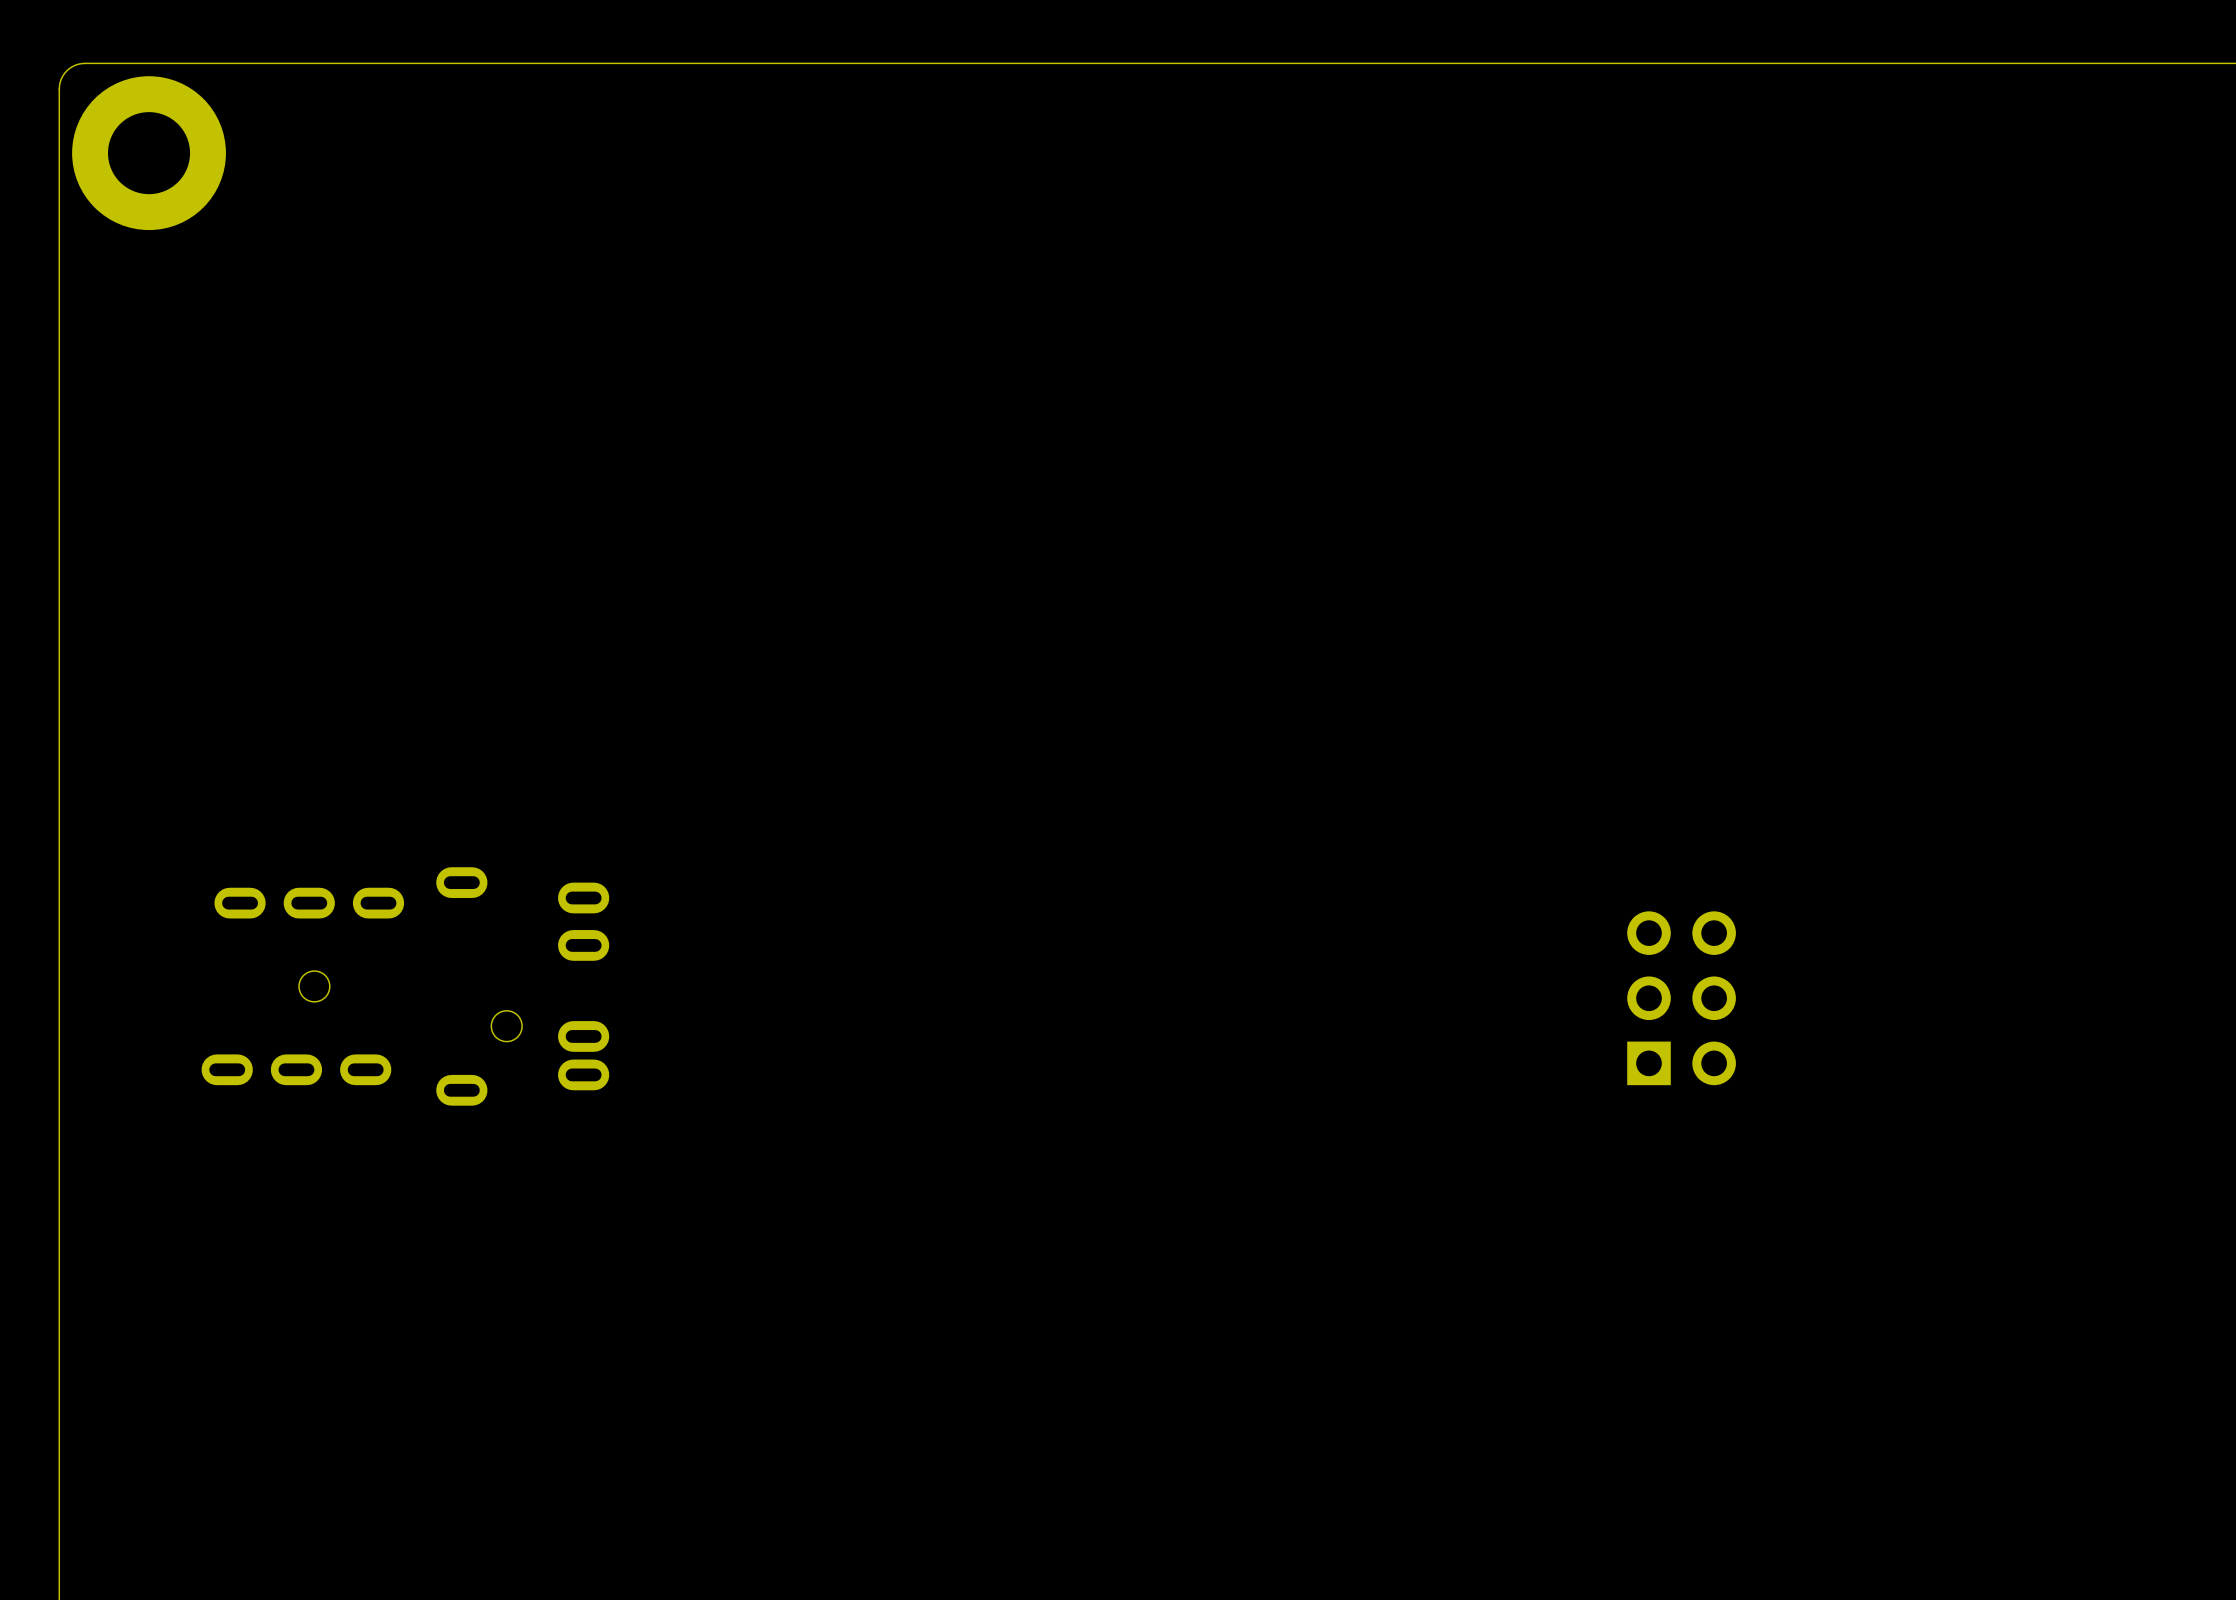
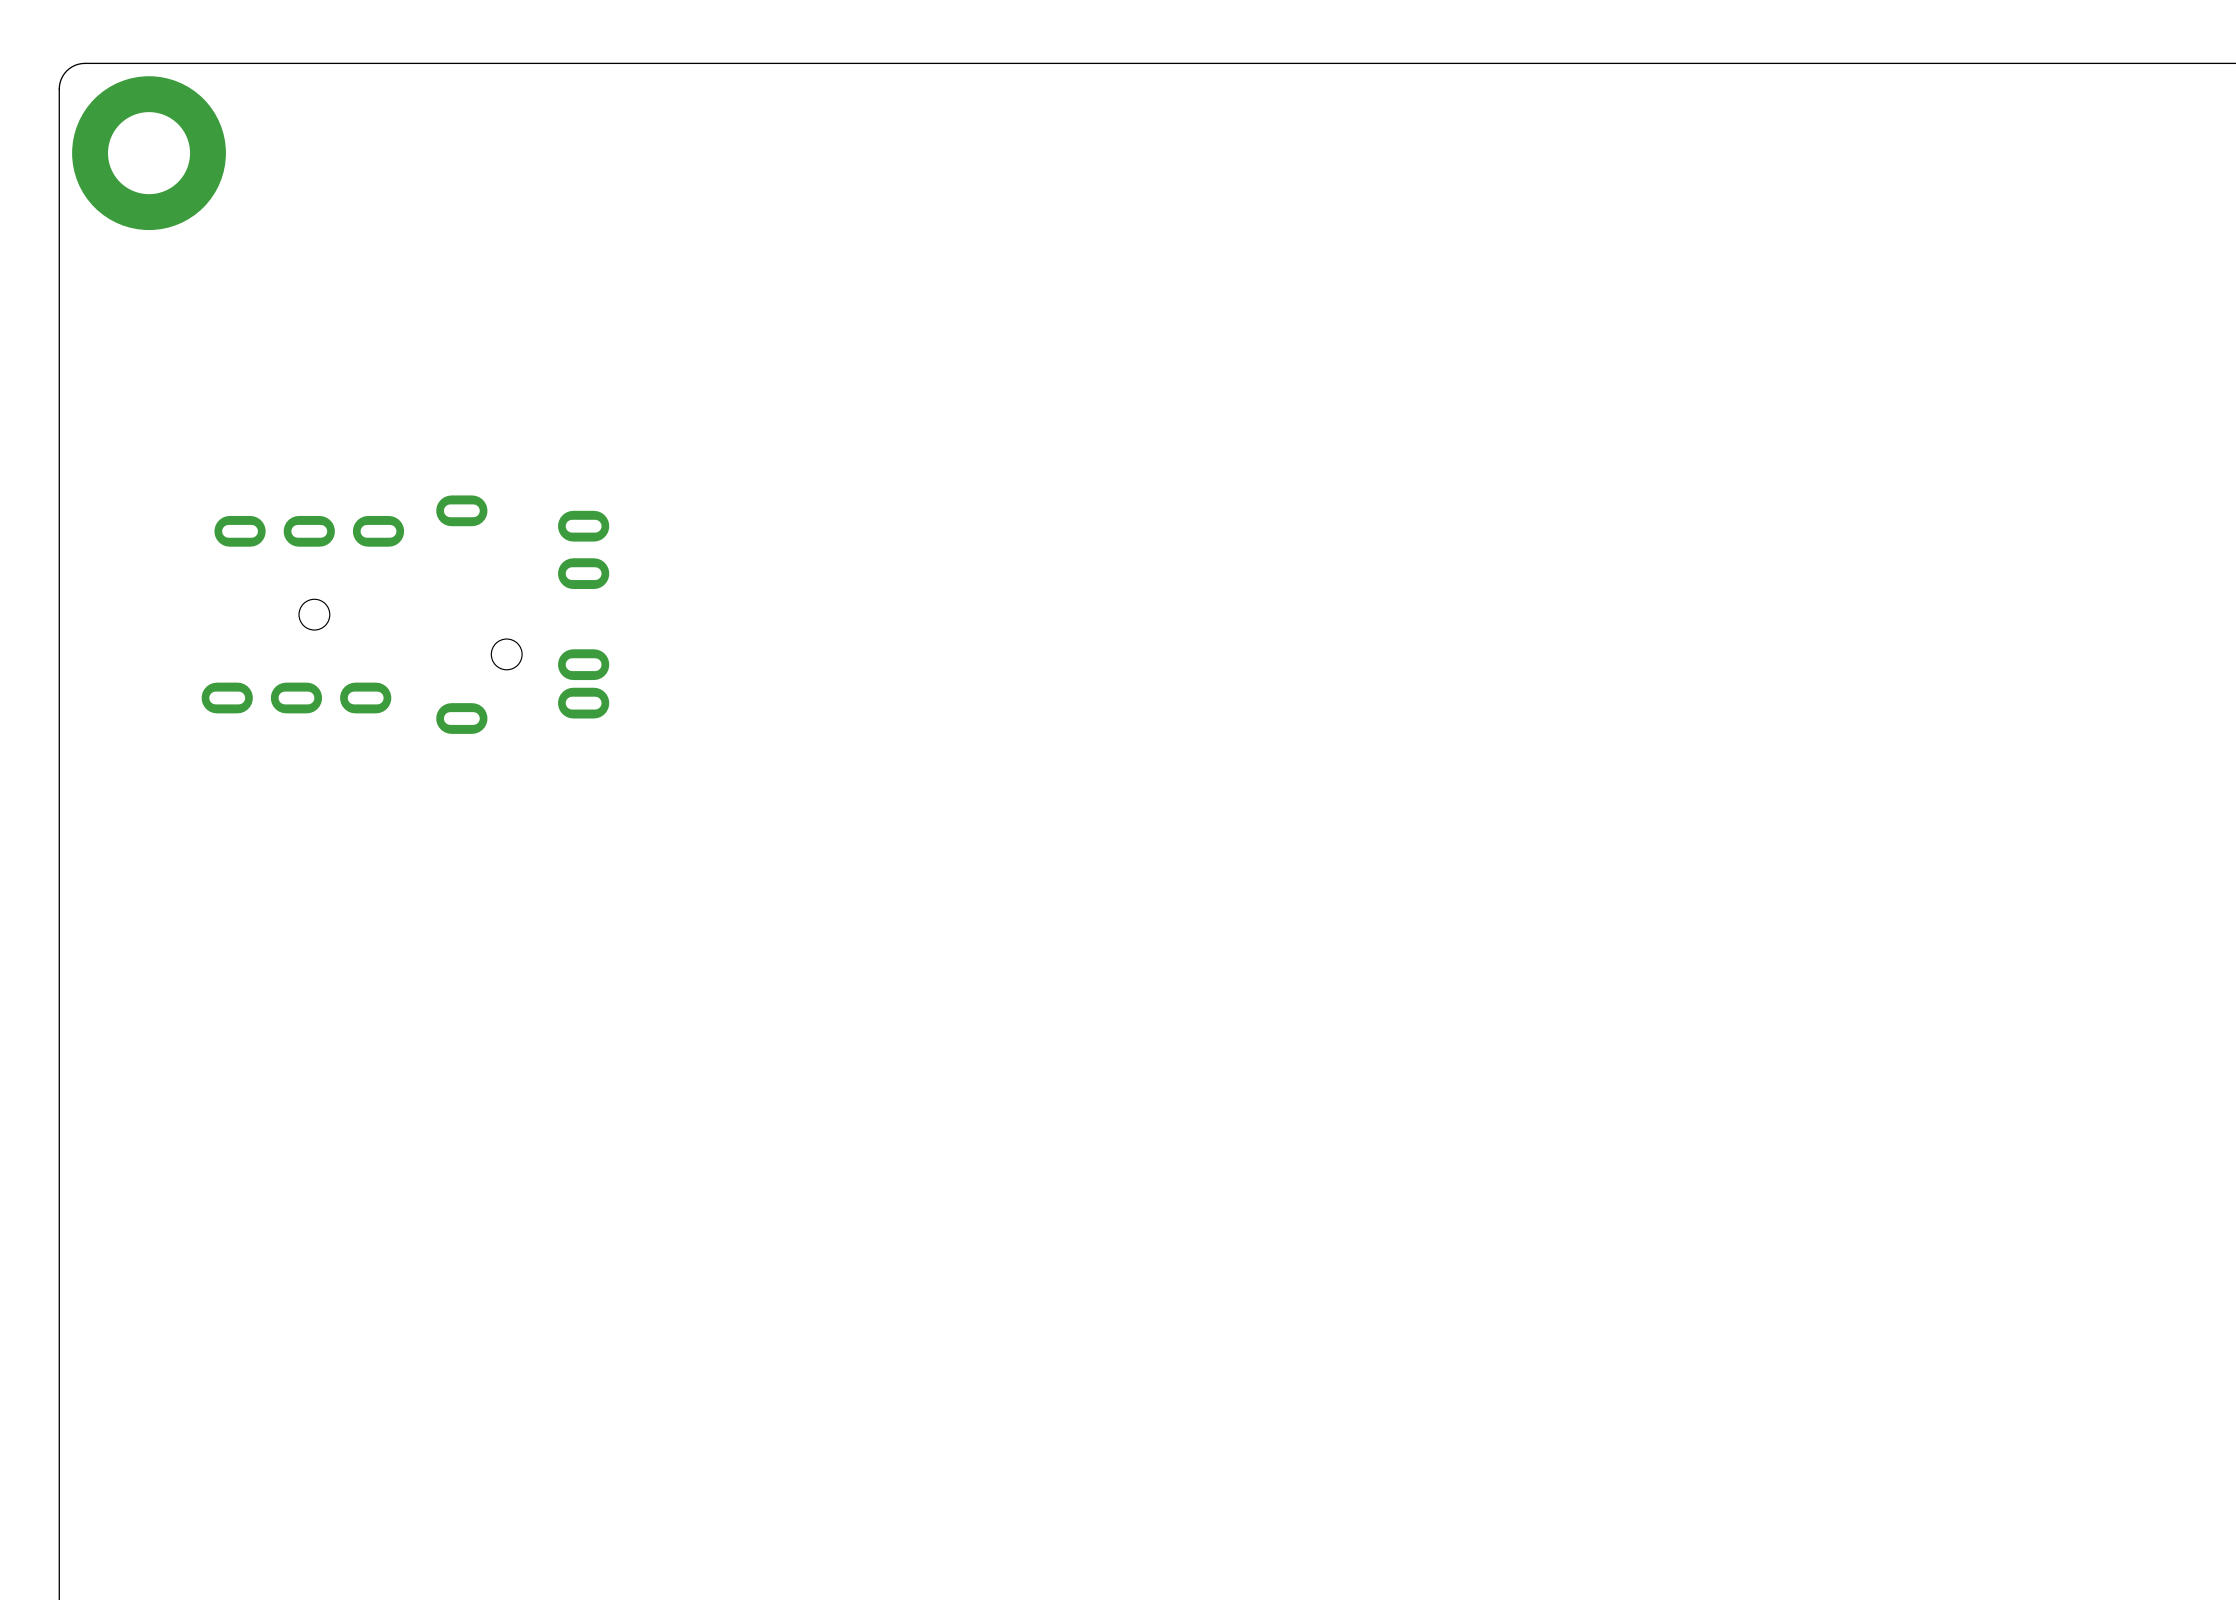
part position: (405, 986) -> (405, 614)
part: (1681, 998) -> none

